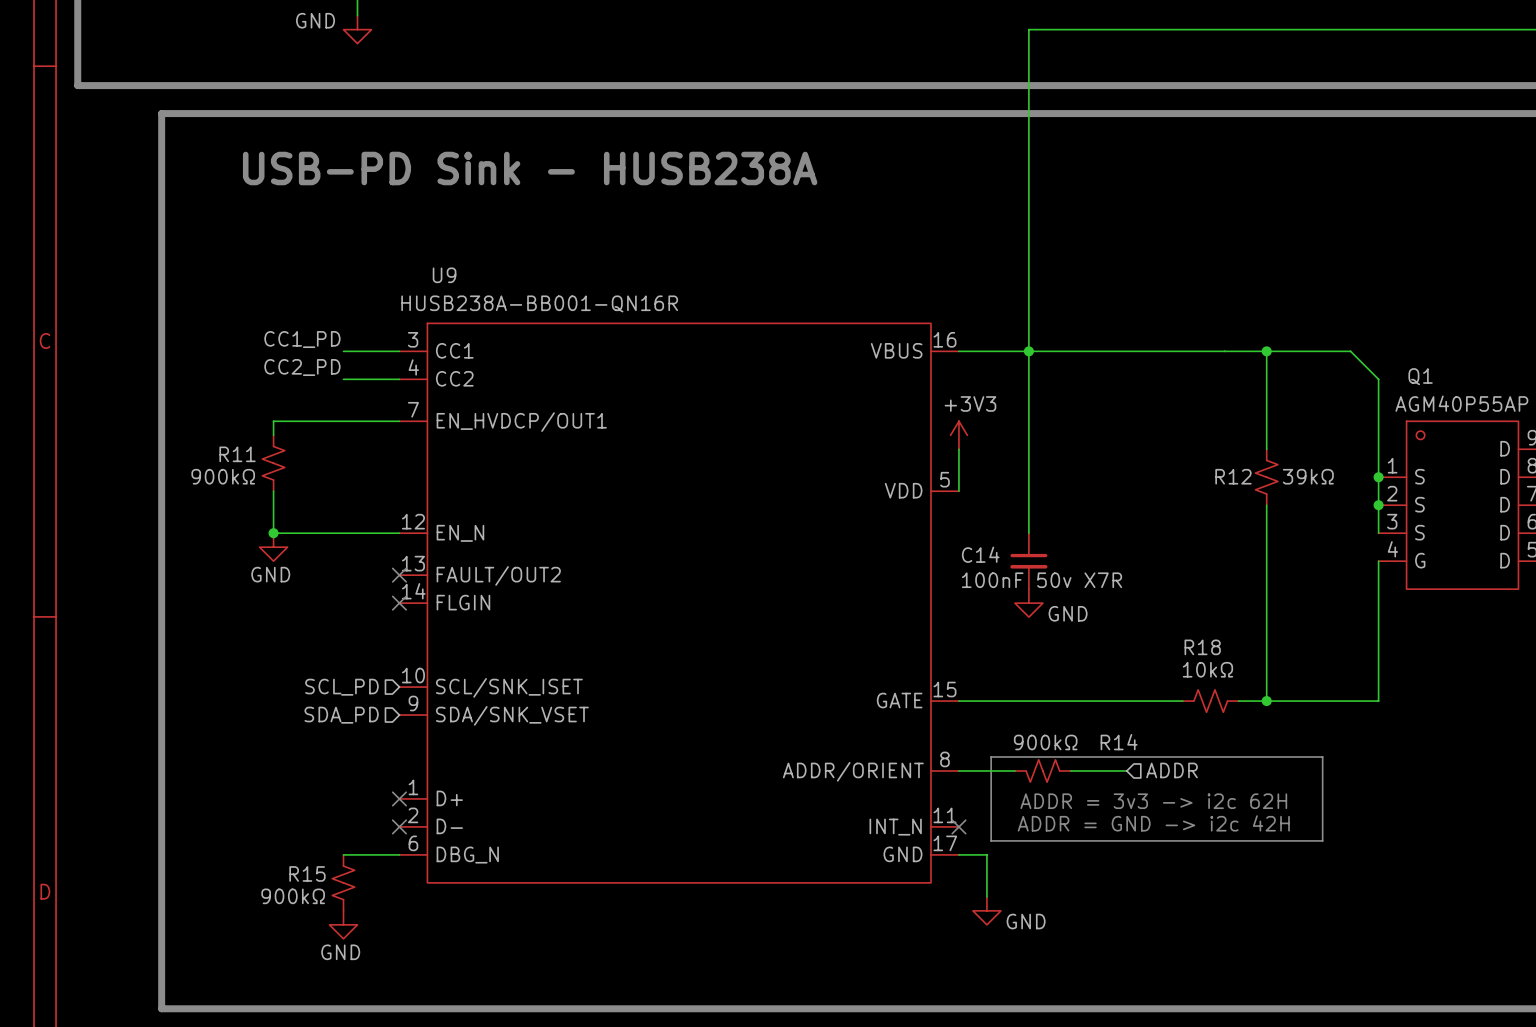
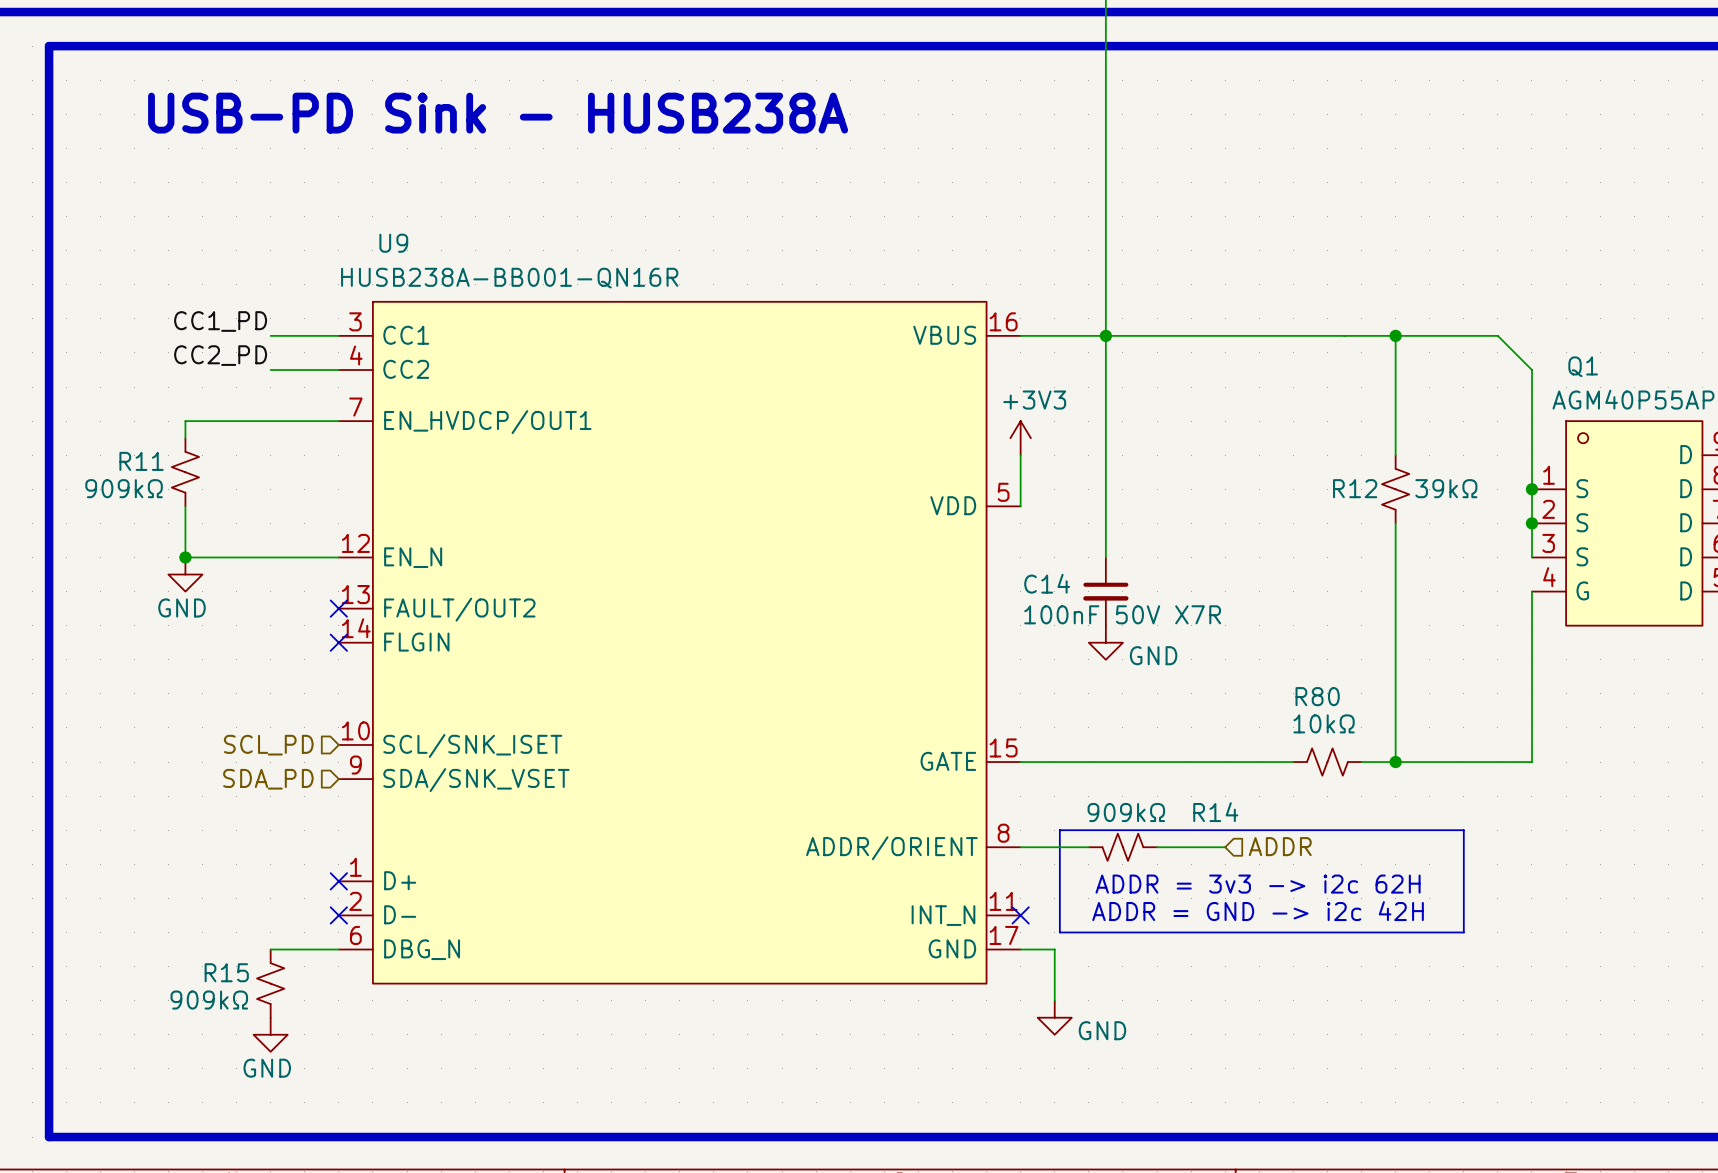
R11 value: 900kΩ (223, 476) -> 909kΩ (124, 488)
C14 value: 100nF 50v X7R (1041, 580) -> 100nF 50V X7R (1122, 614)
R18 name: R18 (1202, 647) -> R80 (1317, 696)
R14 value: 900kΩ (1045, 742) -> 909kΩ (1126, 812)
R15 value: 900kΩ (293, 896) -> 909kΩ (209, 1000)

